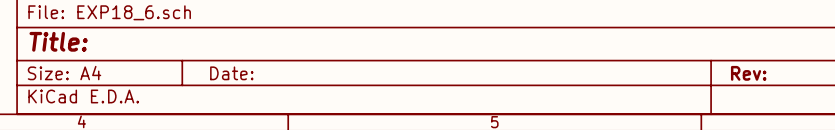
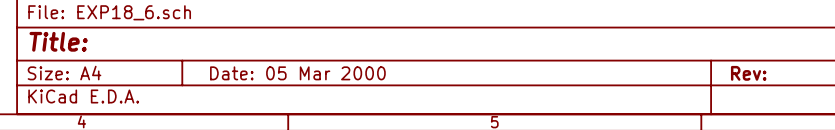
title block: Date: (231, 73) -> Date: 05 Mar 2000 (297, 73)

